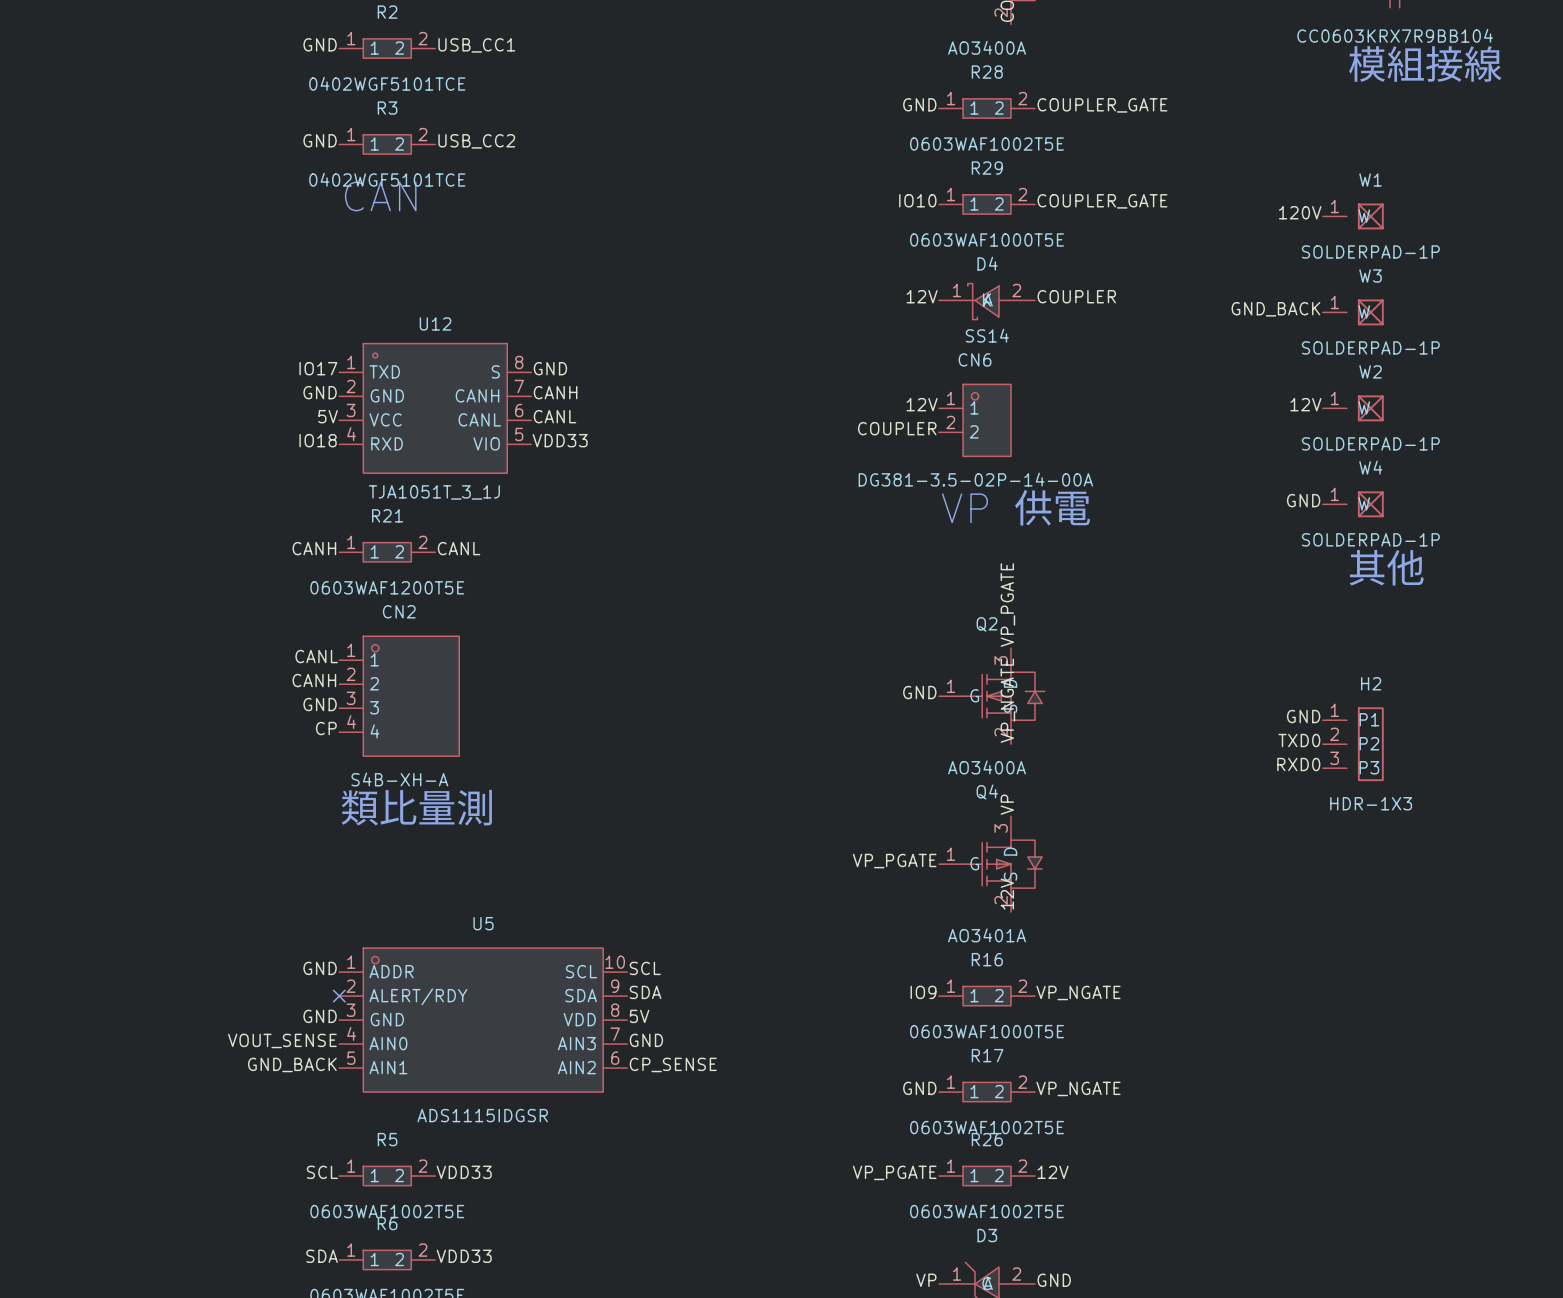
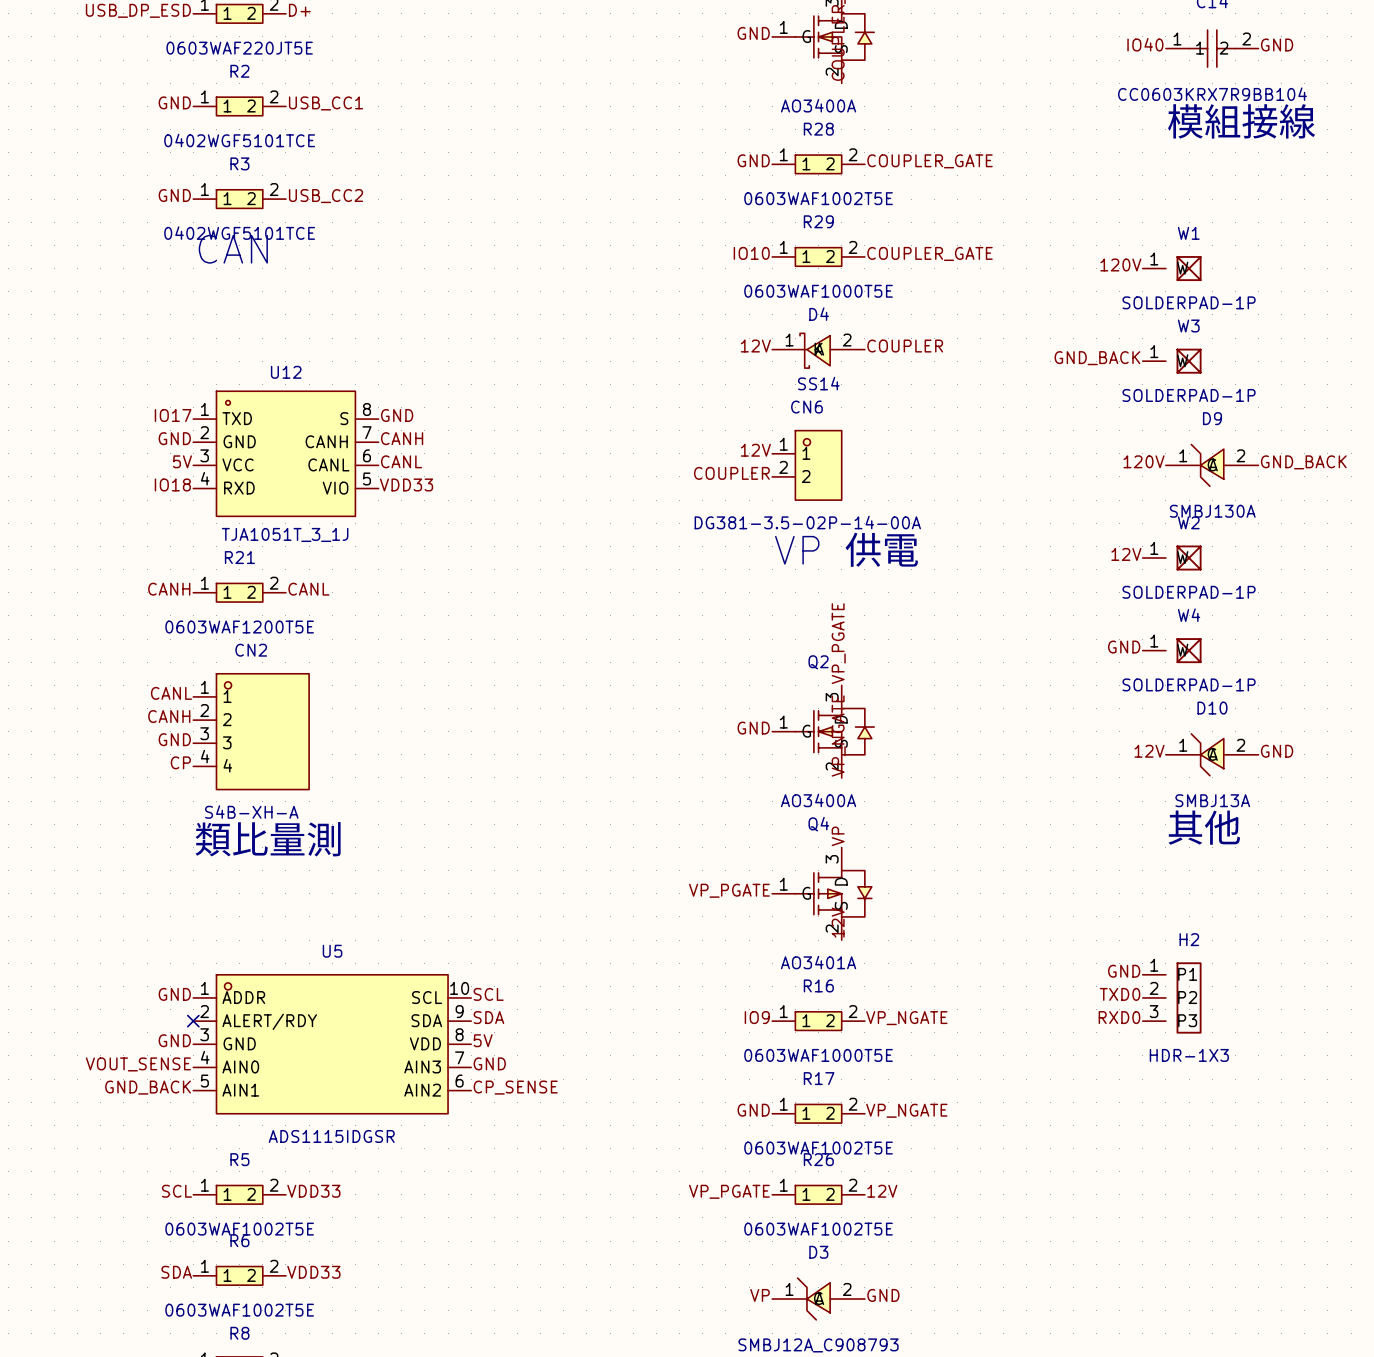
label position: 12V (1305, 404) -> 12V (1126, 554)
W2 position: (1353, 408) -> (1172, 558)
label: none -> 120V (1144, 461)
label: none -> GND_BACK (1303, 462)
D9: none -> SMBJ130A (1212, 465)
label: GND (1303, 500) -> none
W4 position: (1353, 504) -> (1172, 650)
text position: 其他 (1386, 567) -> 其他 (1204, 827)
label: none -> GND (1124, 647)
label: GND (1303, 716) -> none
label: none -> 12V (1149, 751)
label: none -> GND (1277, 751)
D10: none -> SMBJ13A (1212, 754)
label position: TXD0 (1299, 740) -> TXD0 (1120, 994)
H2 position: (1353, 744) -> (1172, 997)
label position: RXD0 (1298, 764) -> RXD0 (1119, 1017)
label: none -> GND (1124, 971)

